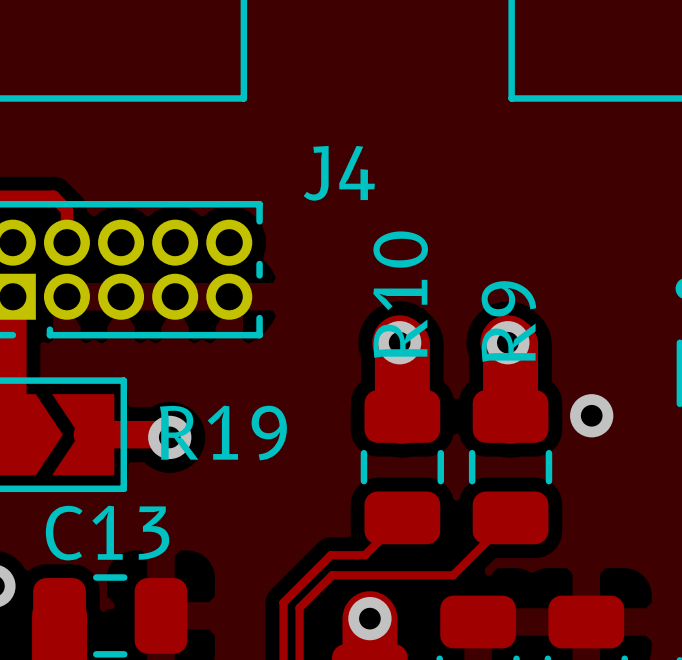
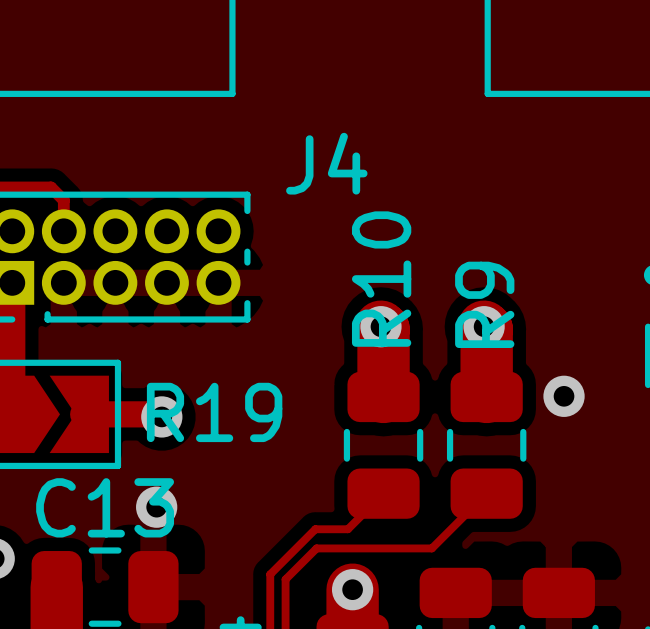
via: none -> (156, 507)

